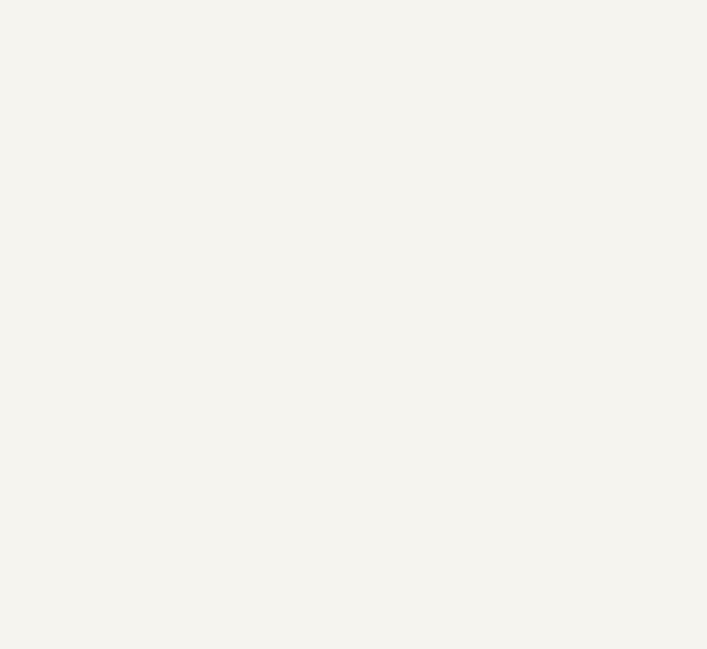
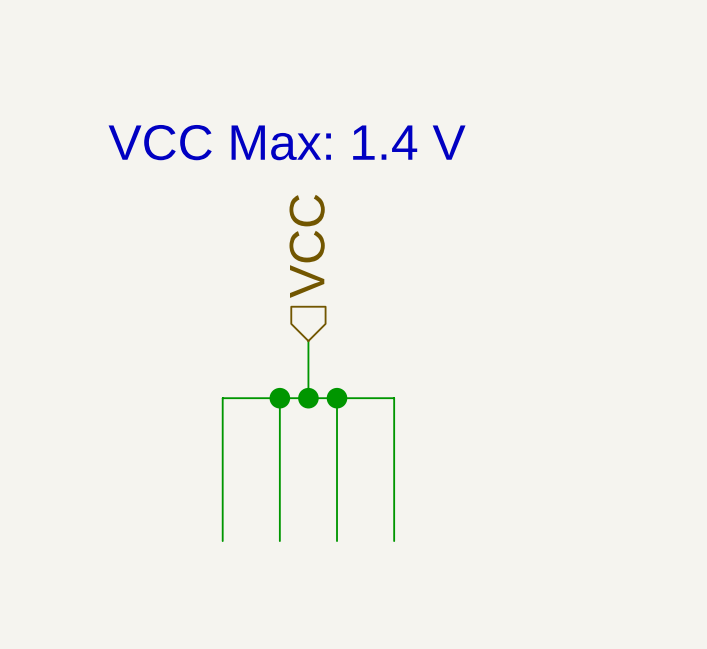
text: none -> VCC Max: 1.4 V (287, 142)
hierarchical label: none -> VCC (307, 246)
wire: none -> (308, 341) (308, 398)
wire: none -> (279, 398) (279, 541)
junction: none -> (279, 398)
junction: none -> (308, 398)
wire: none -> (337, 398) (337, 541)
junction: none -> (337, 398)
wire: none -> (222, 541) (222, 398) (394, 398) (394, 541)

